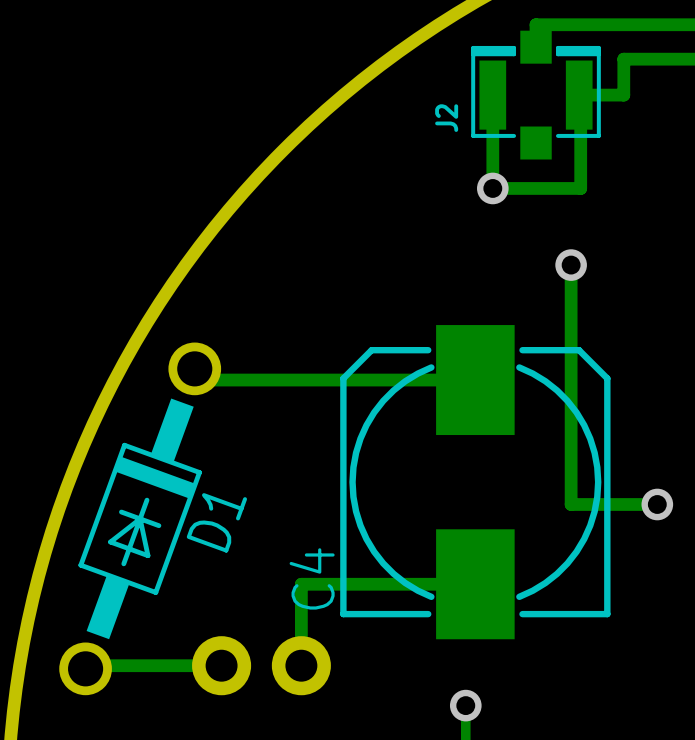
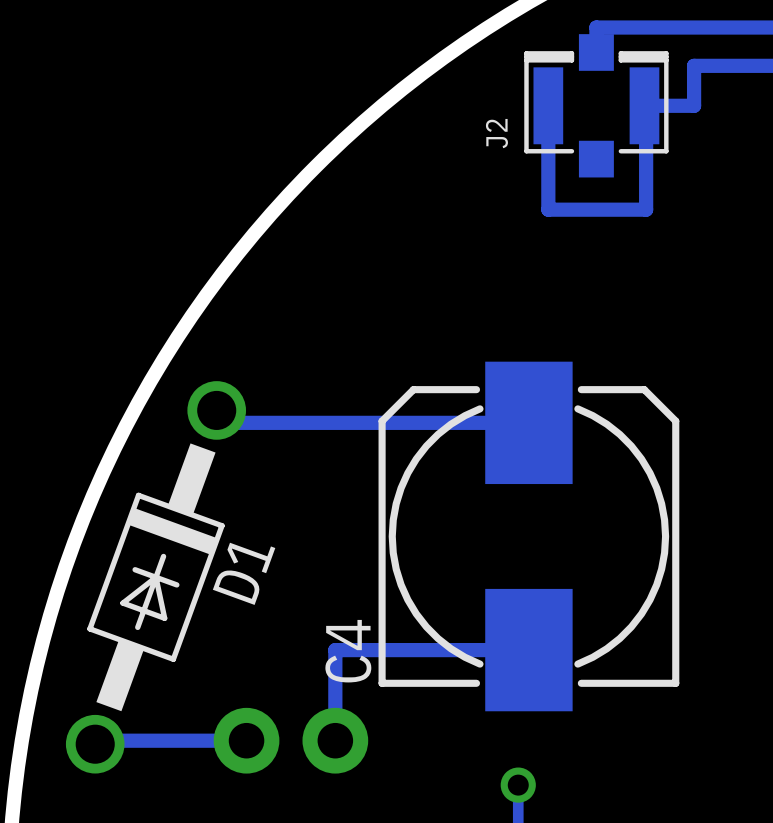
via: (492, 188) -> none
track: (571, 265) (571, 504) (657, 504) -> none
via: (571, 265) -> none
via: (657, 504) -> none

